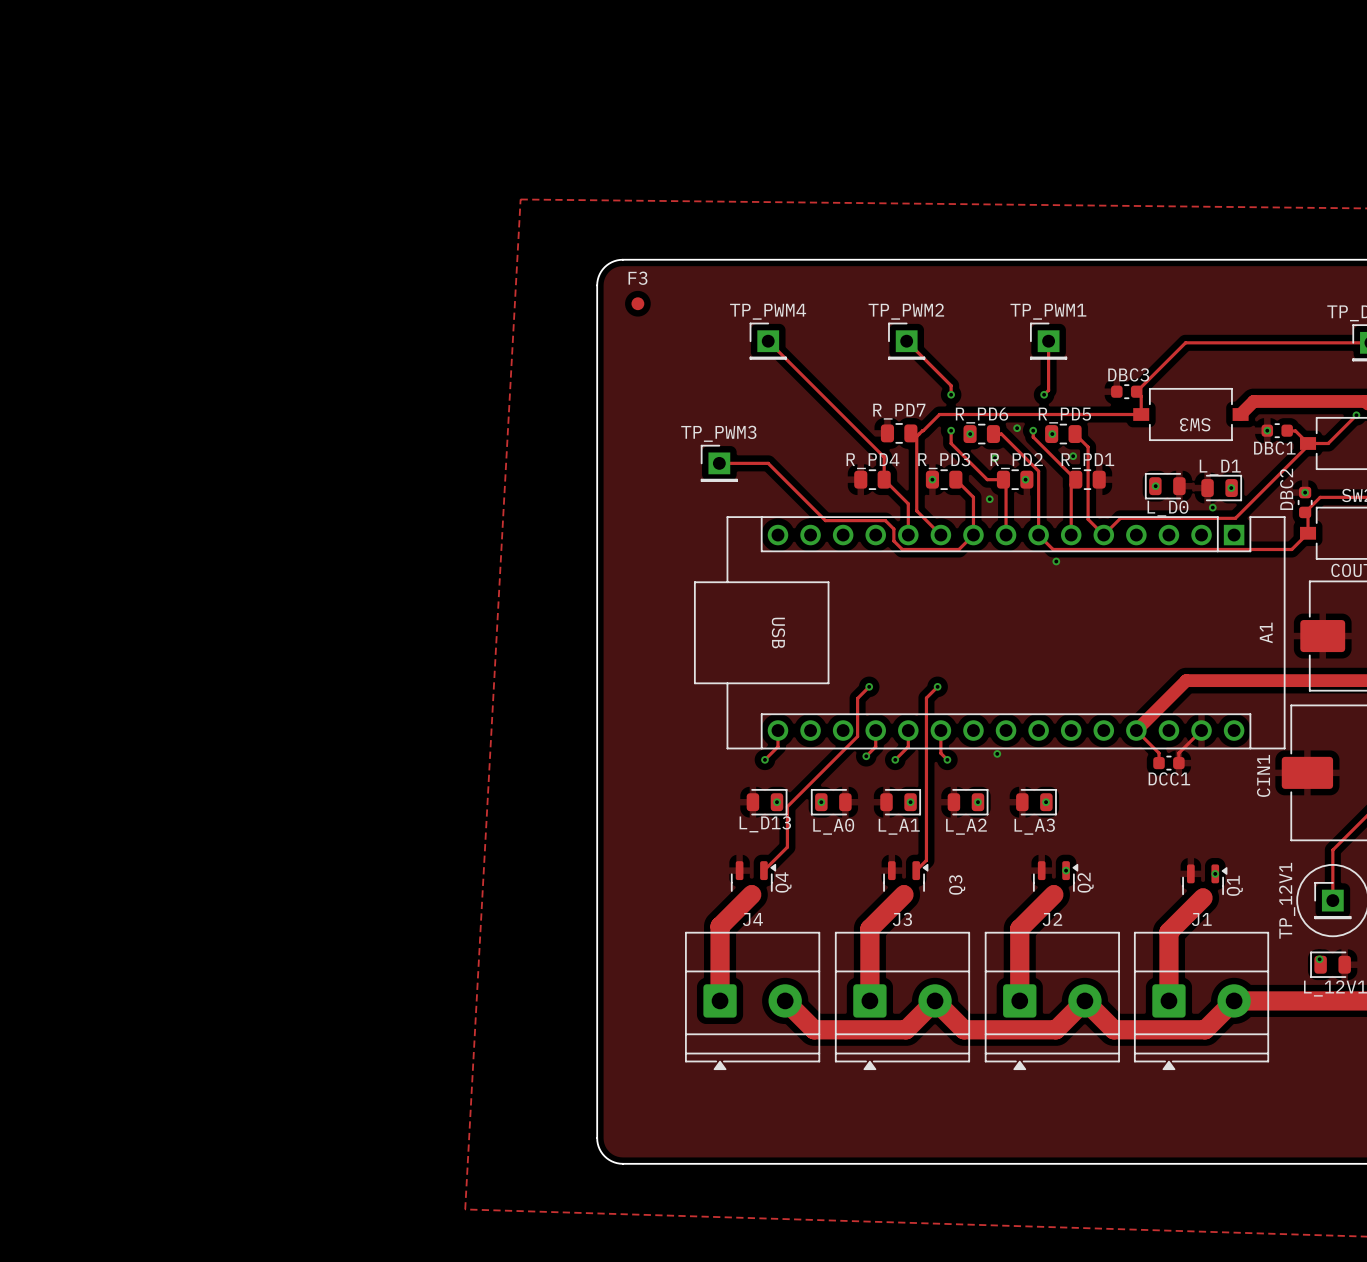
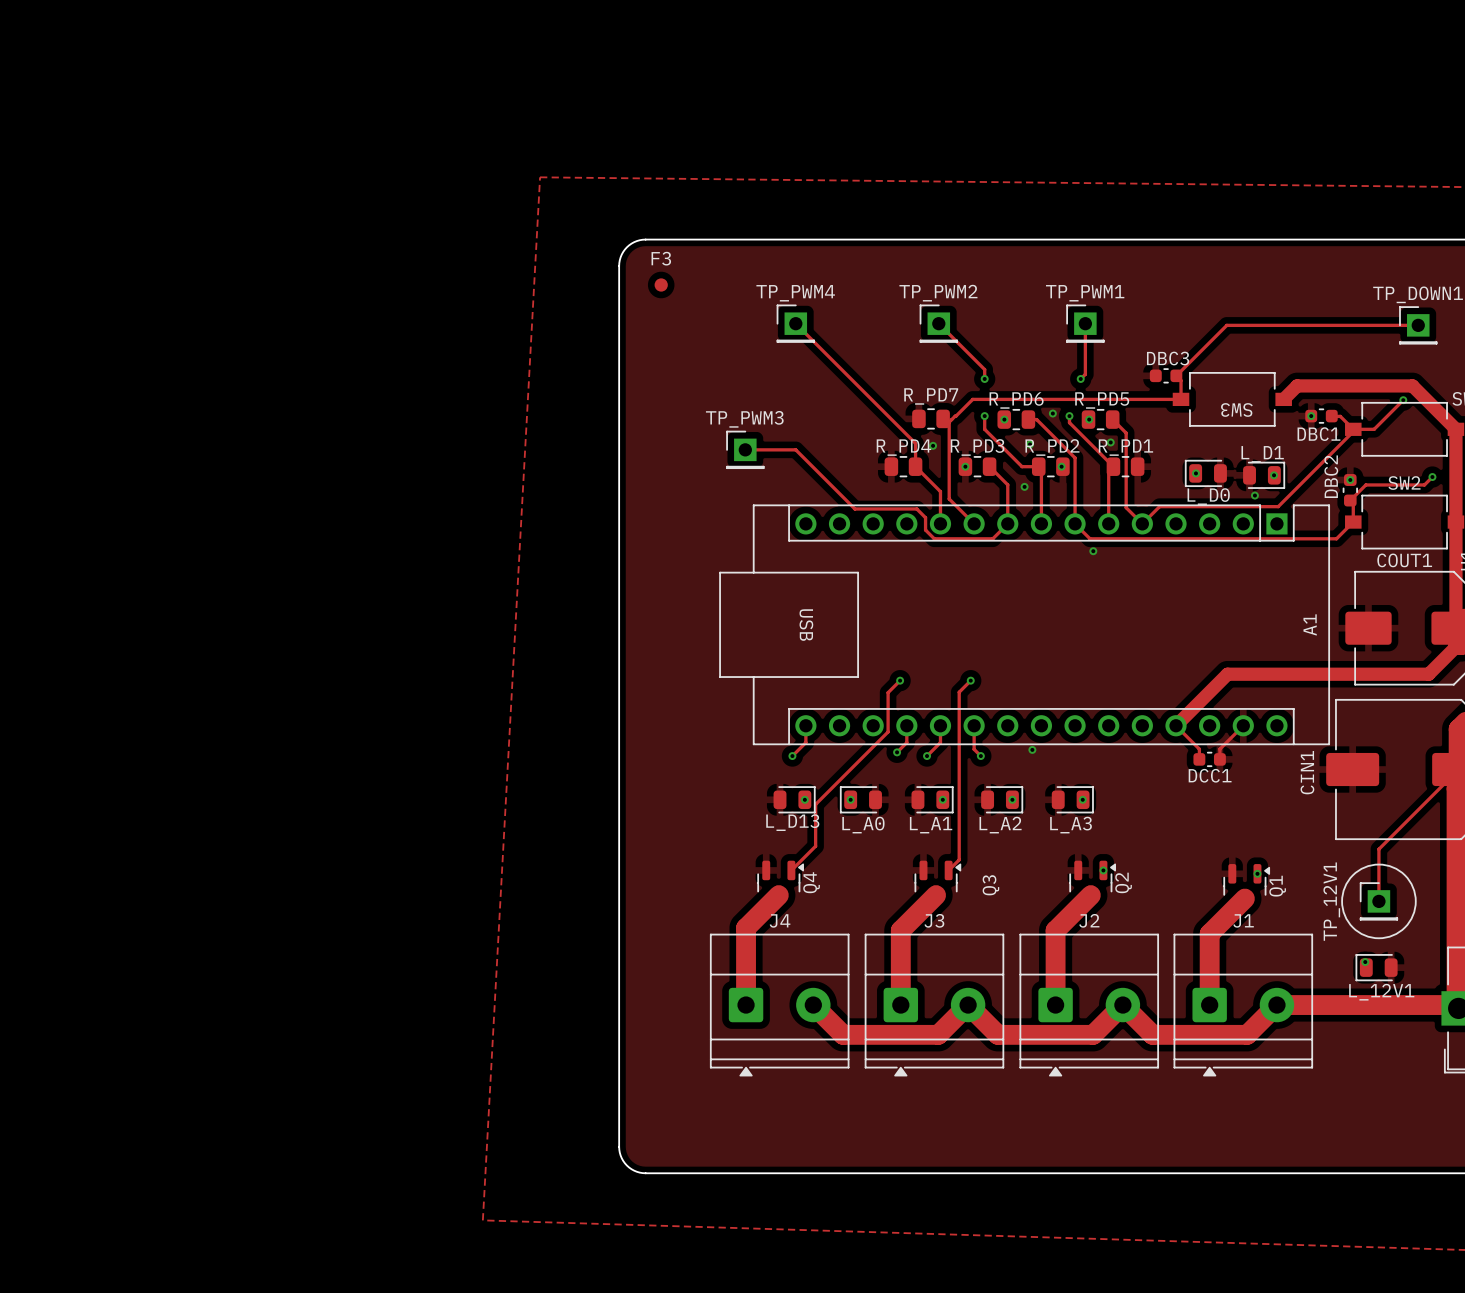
via: none -> (933, 445)

